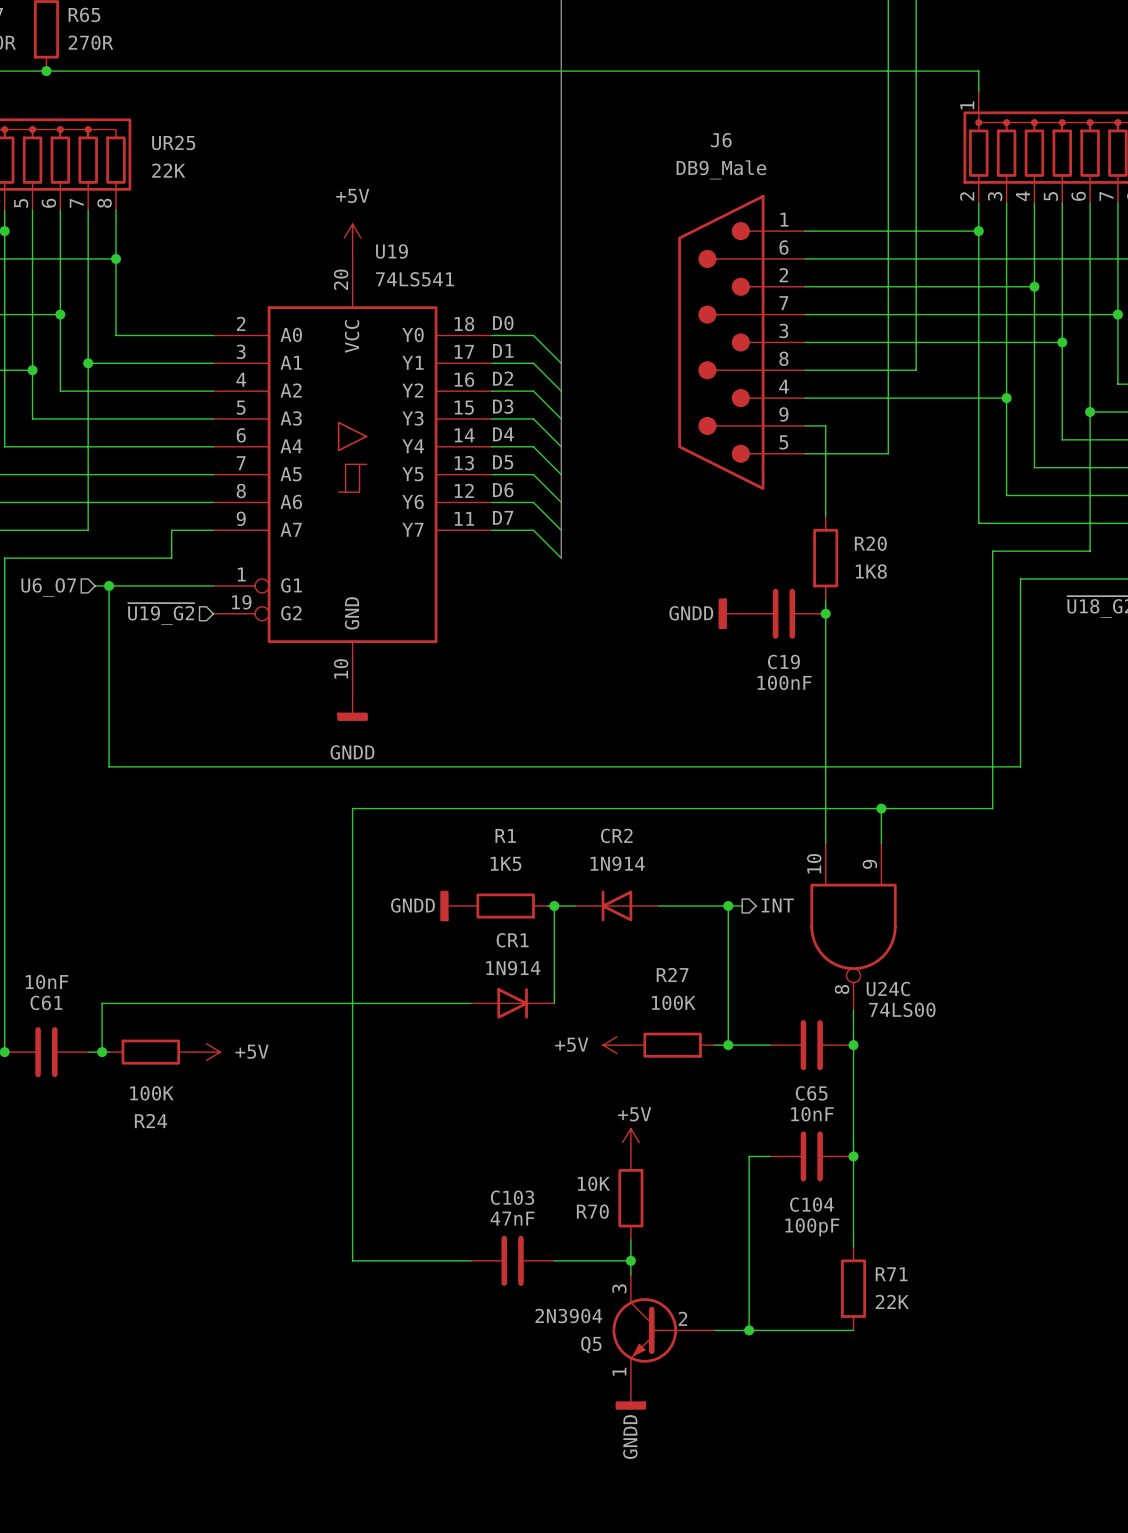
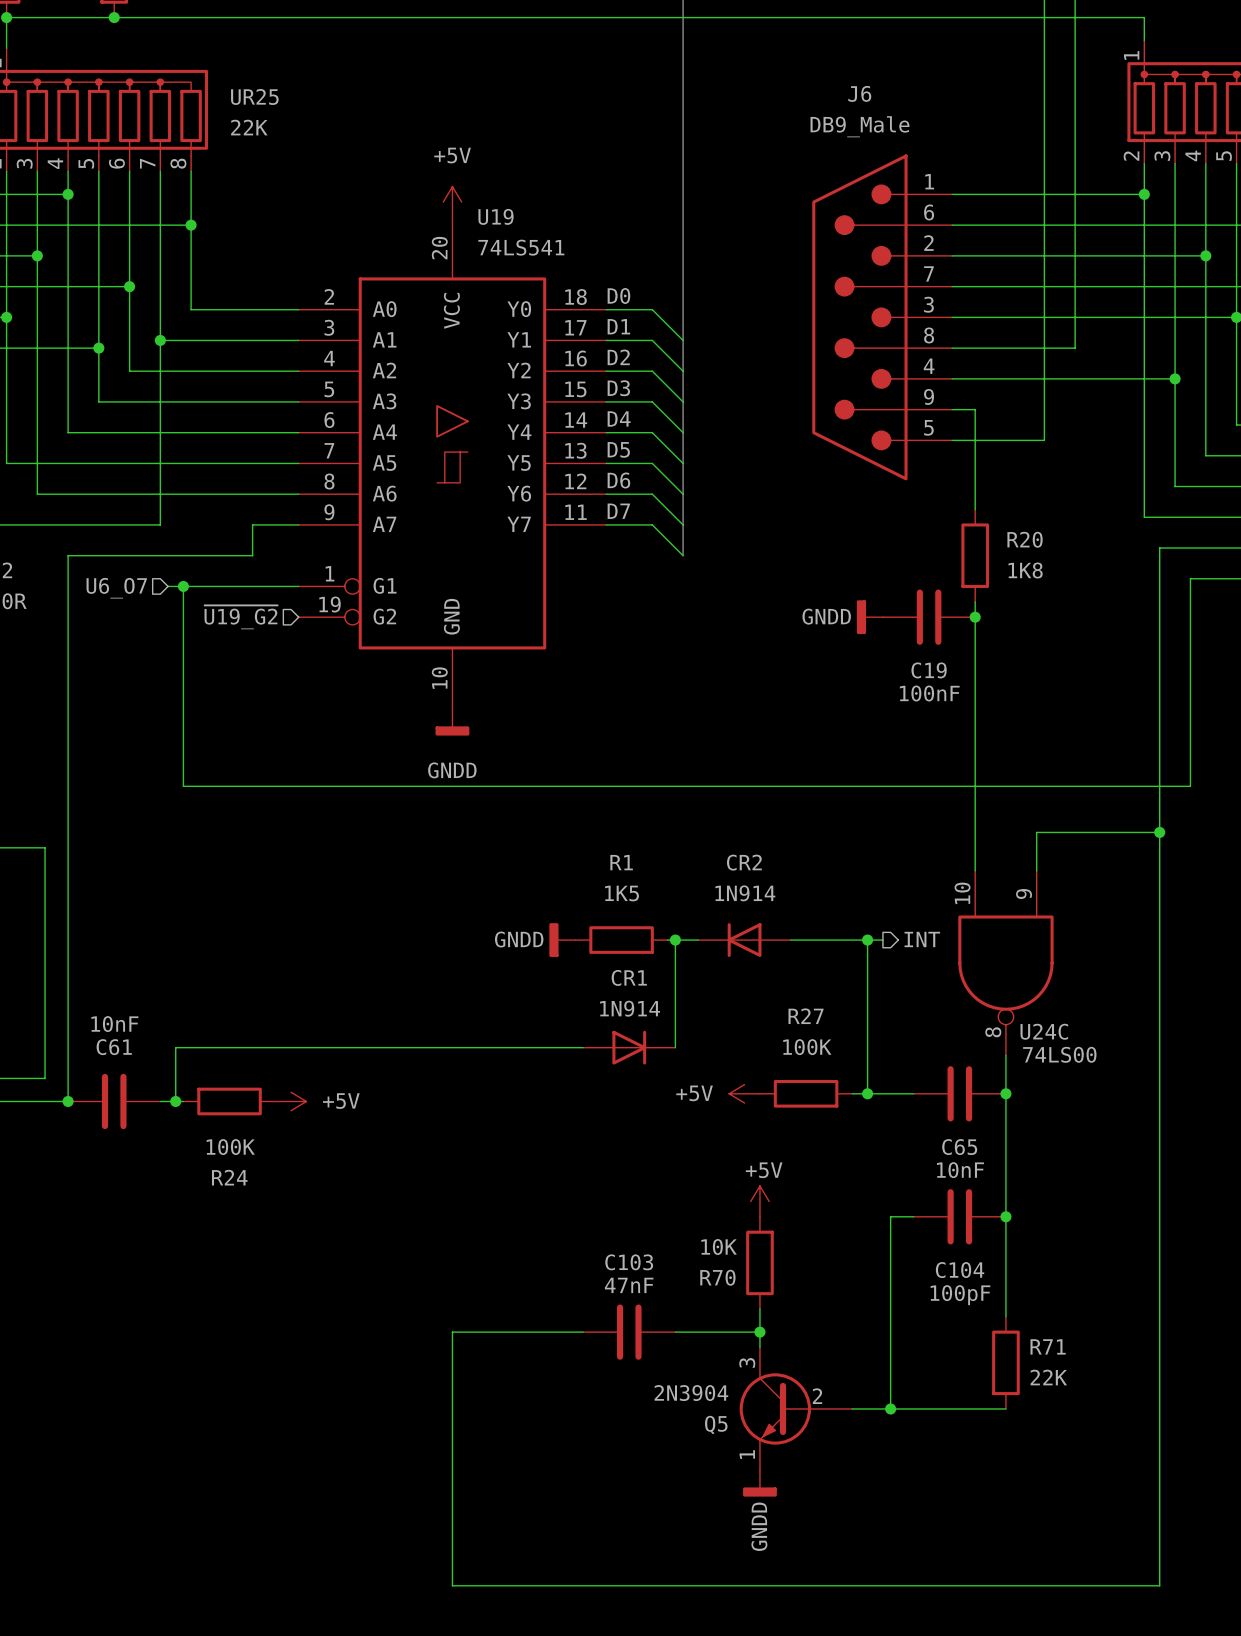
wire: (881, 808) (352, 808) (352, 1260) -> (1159, 832) (1159, 1585) (452, 1585) (452, 1332)
junction: (881, 808) -> none
junction: none -> (1159, 832)

